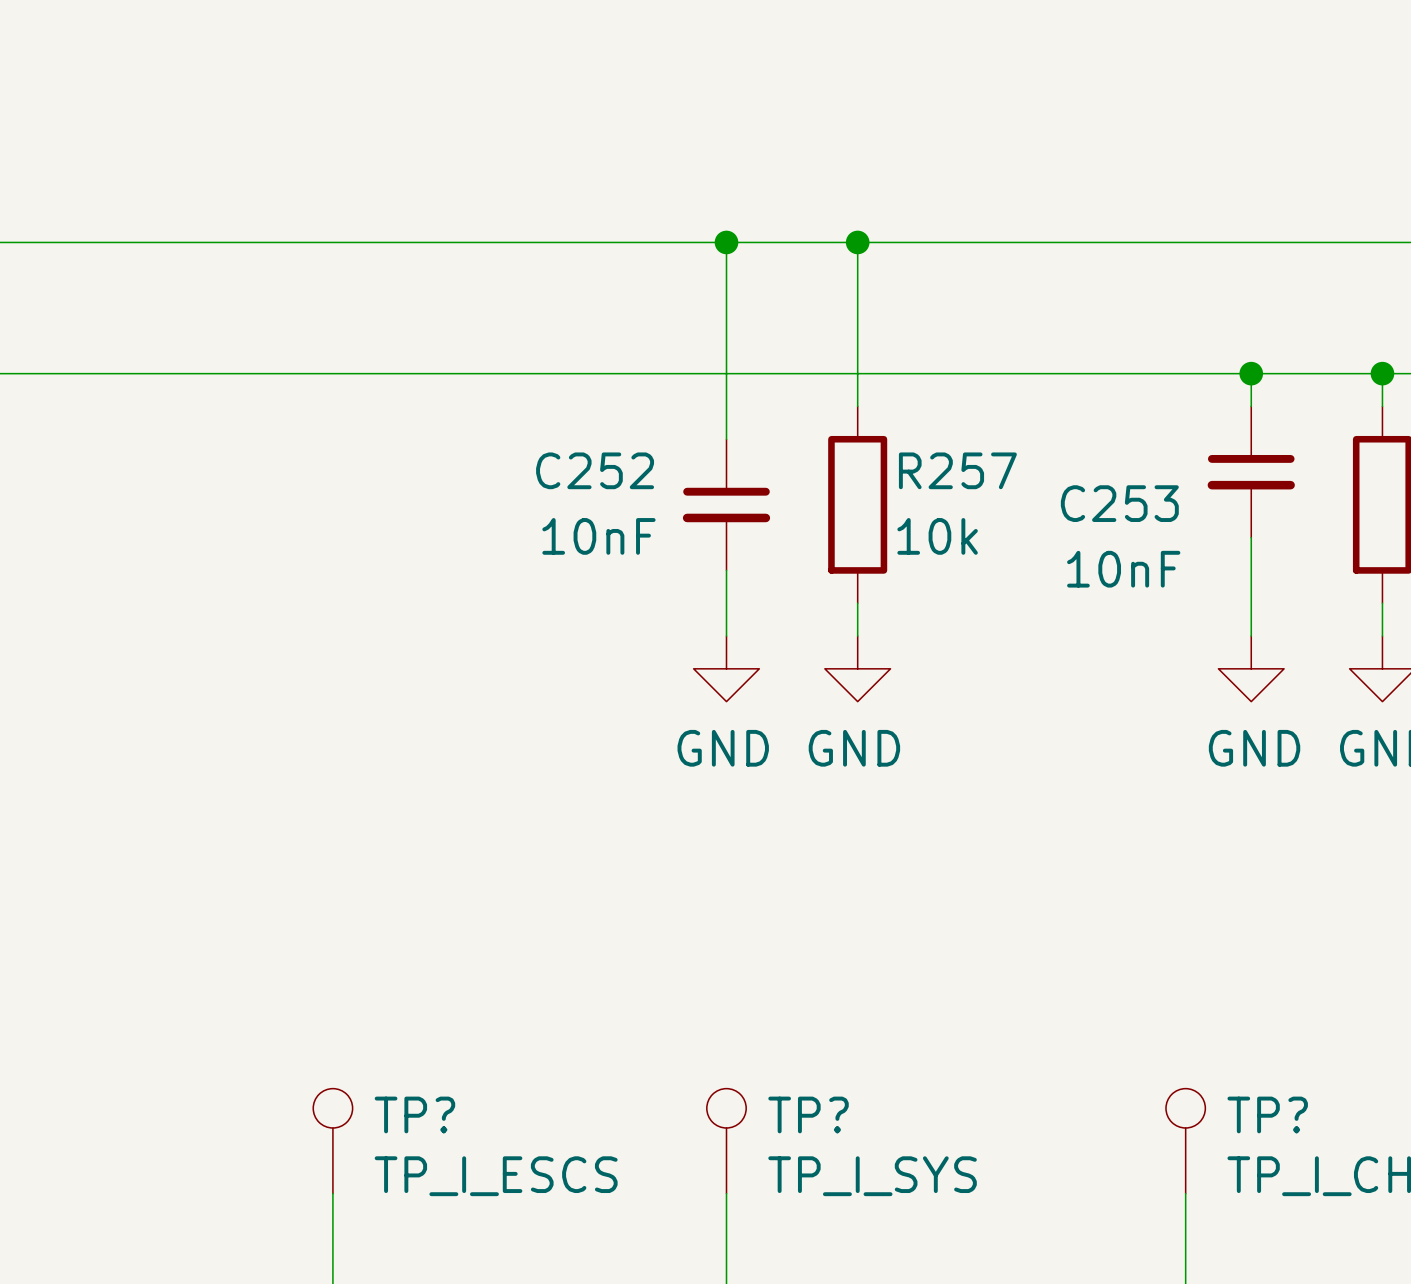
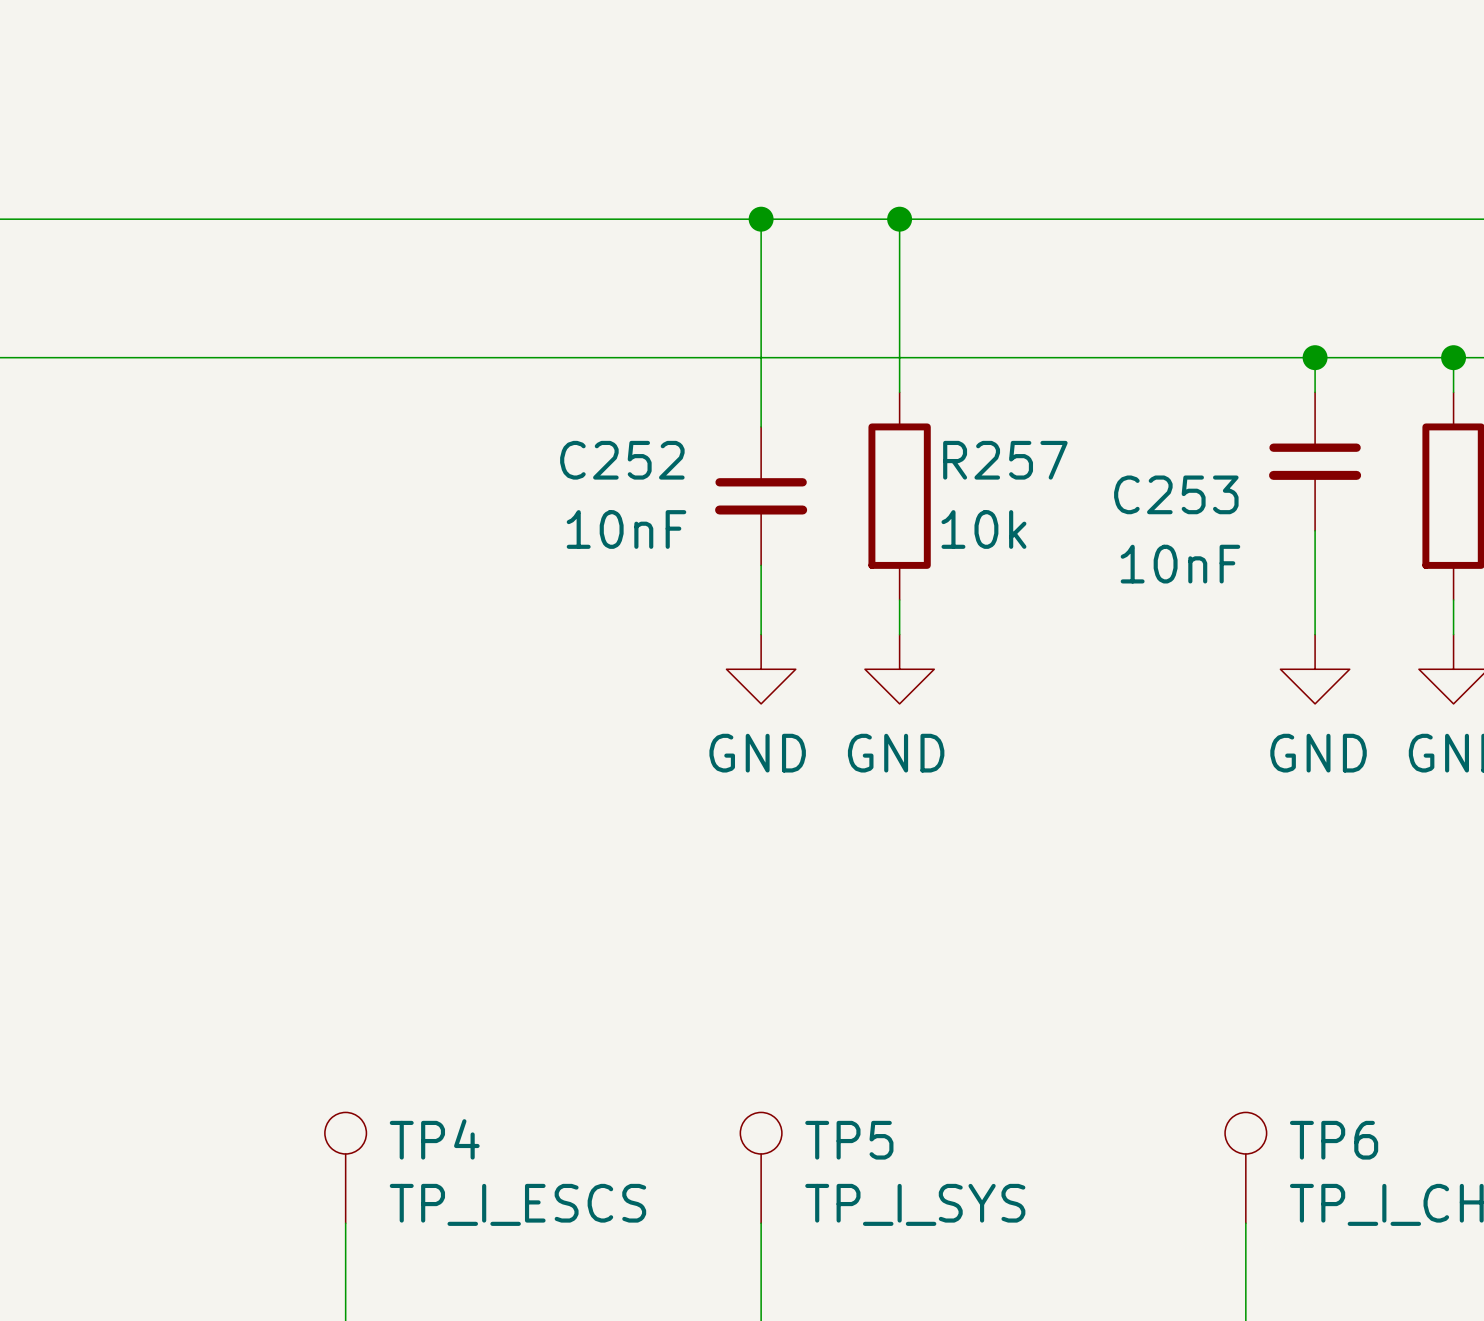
TP? name: TP? (414, 1114) -> TP4 (434, 1139)
TP? name: TP? (808, 1114) -> TP5 (849, 1140)
TP? name: TP? (1267, 1114) -> TP6 (1334, 1140)

